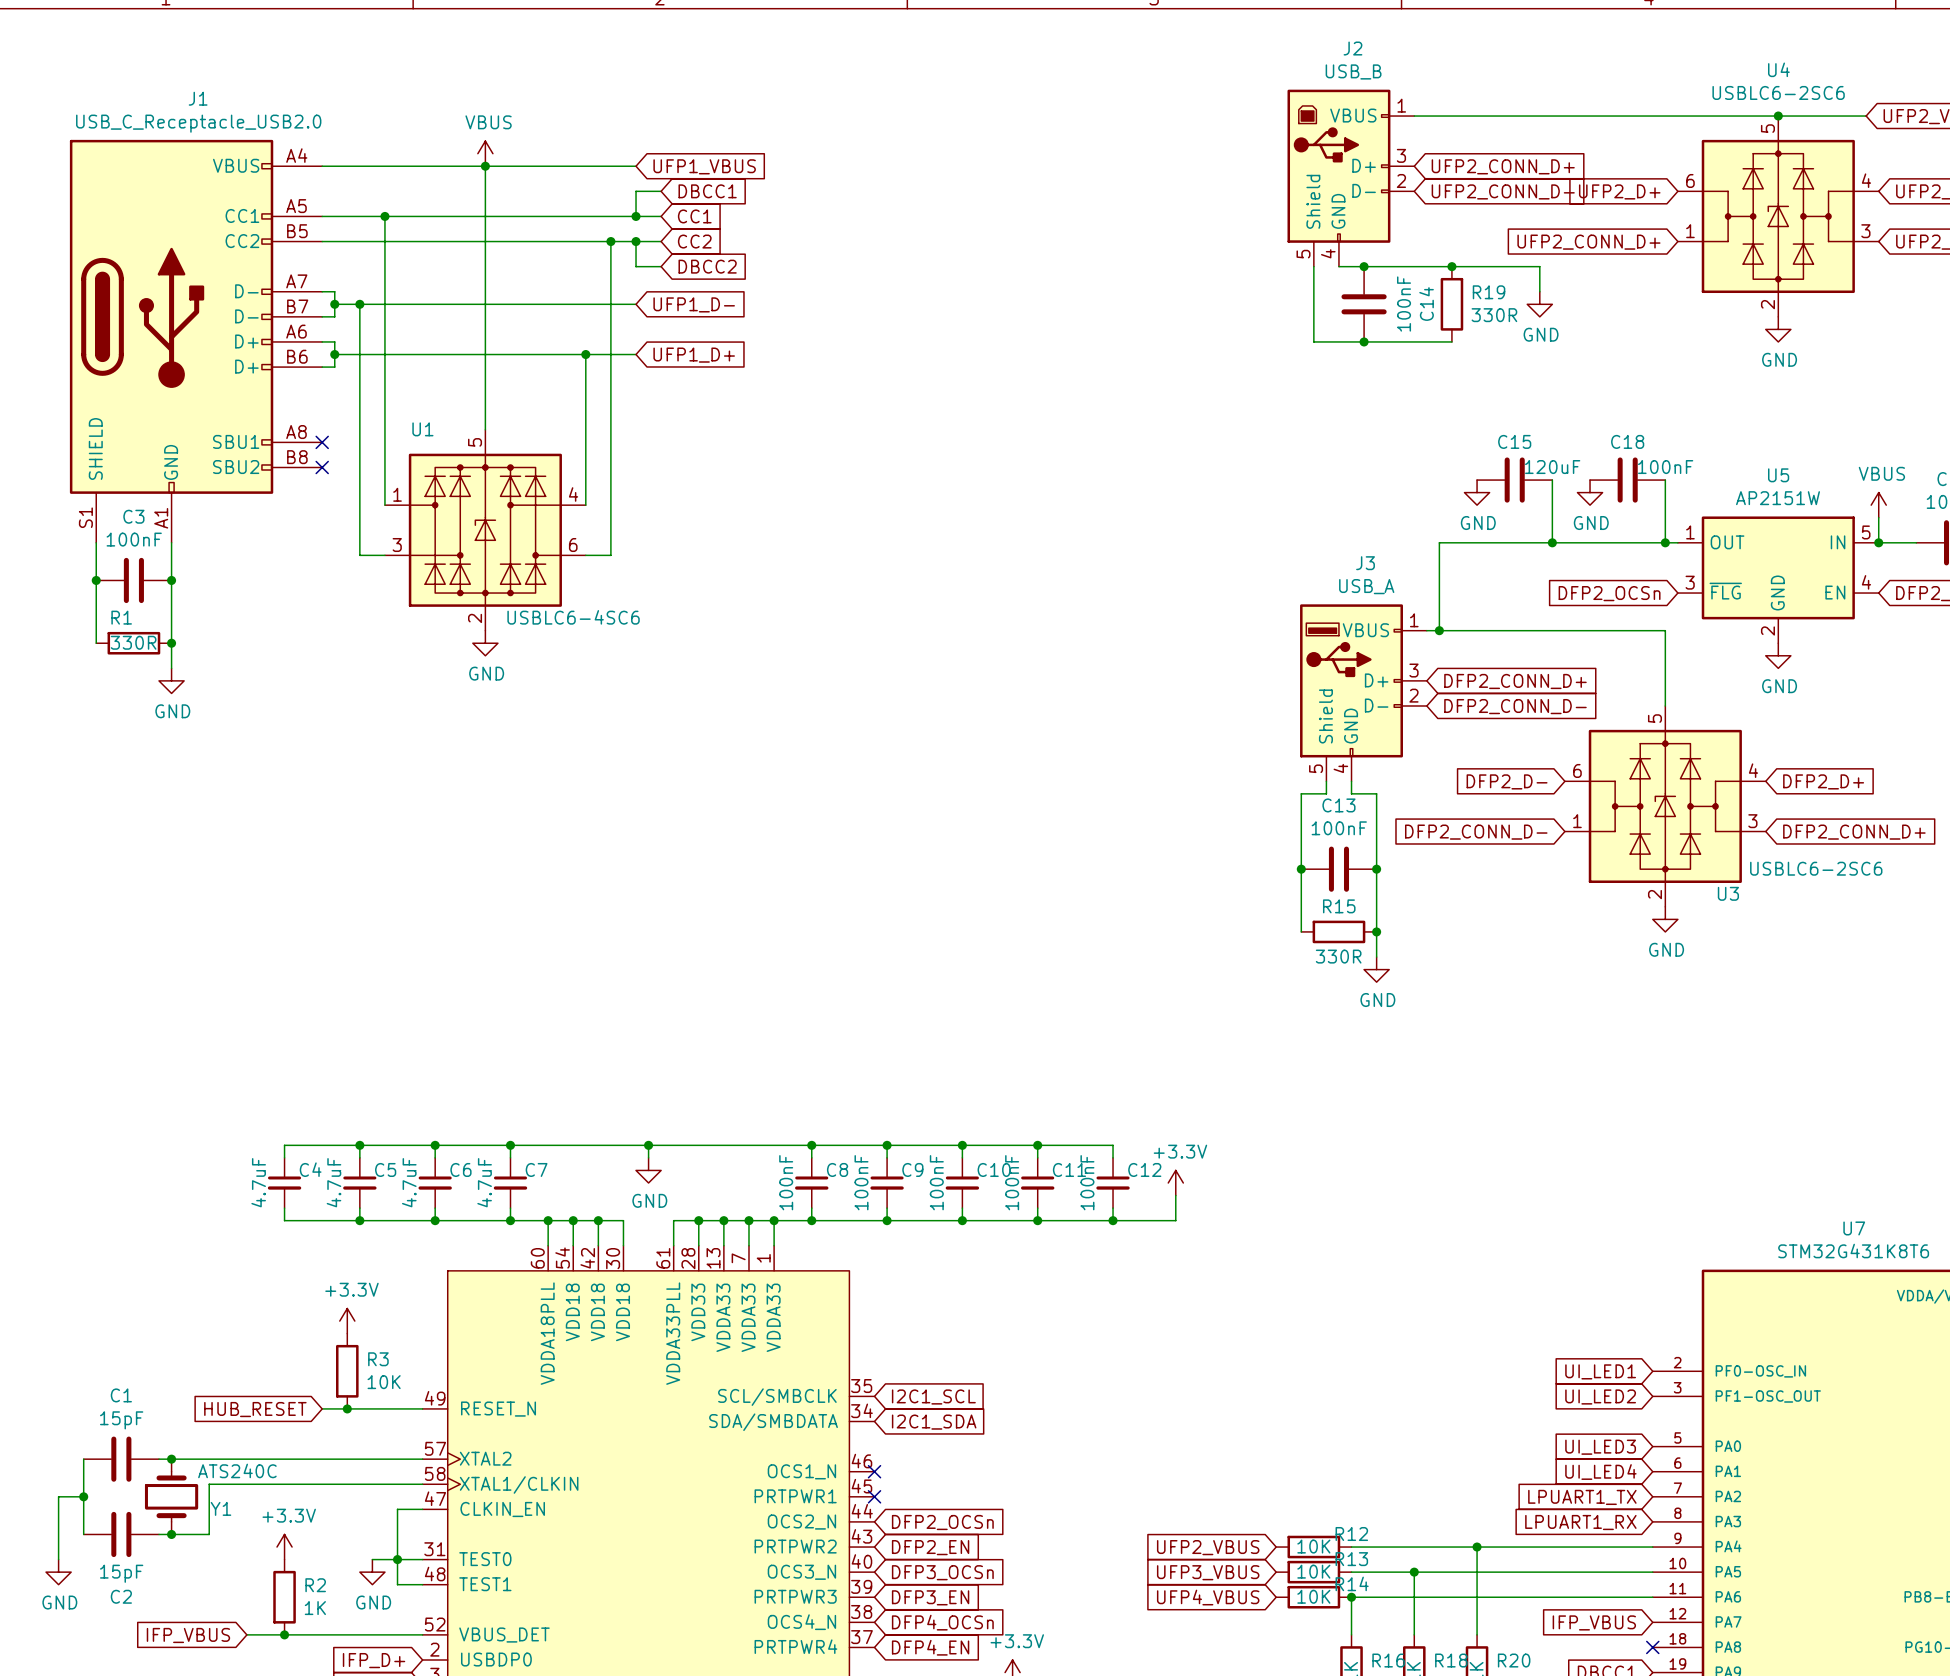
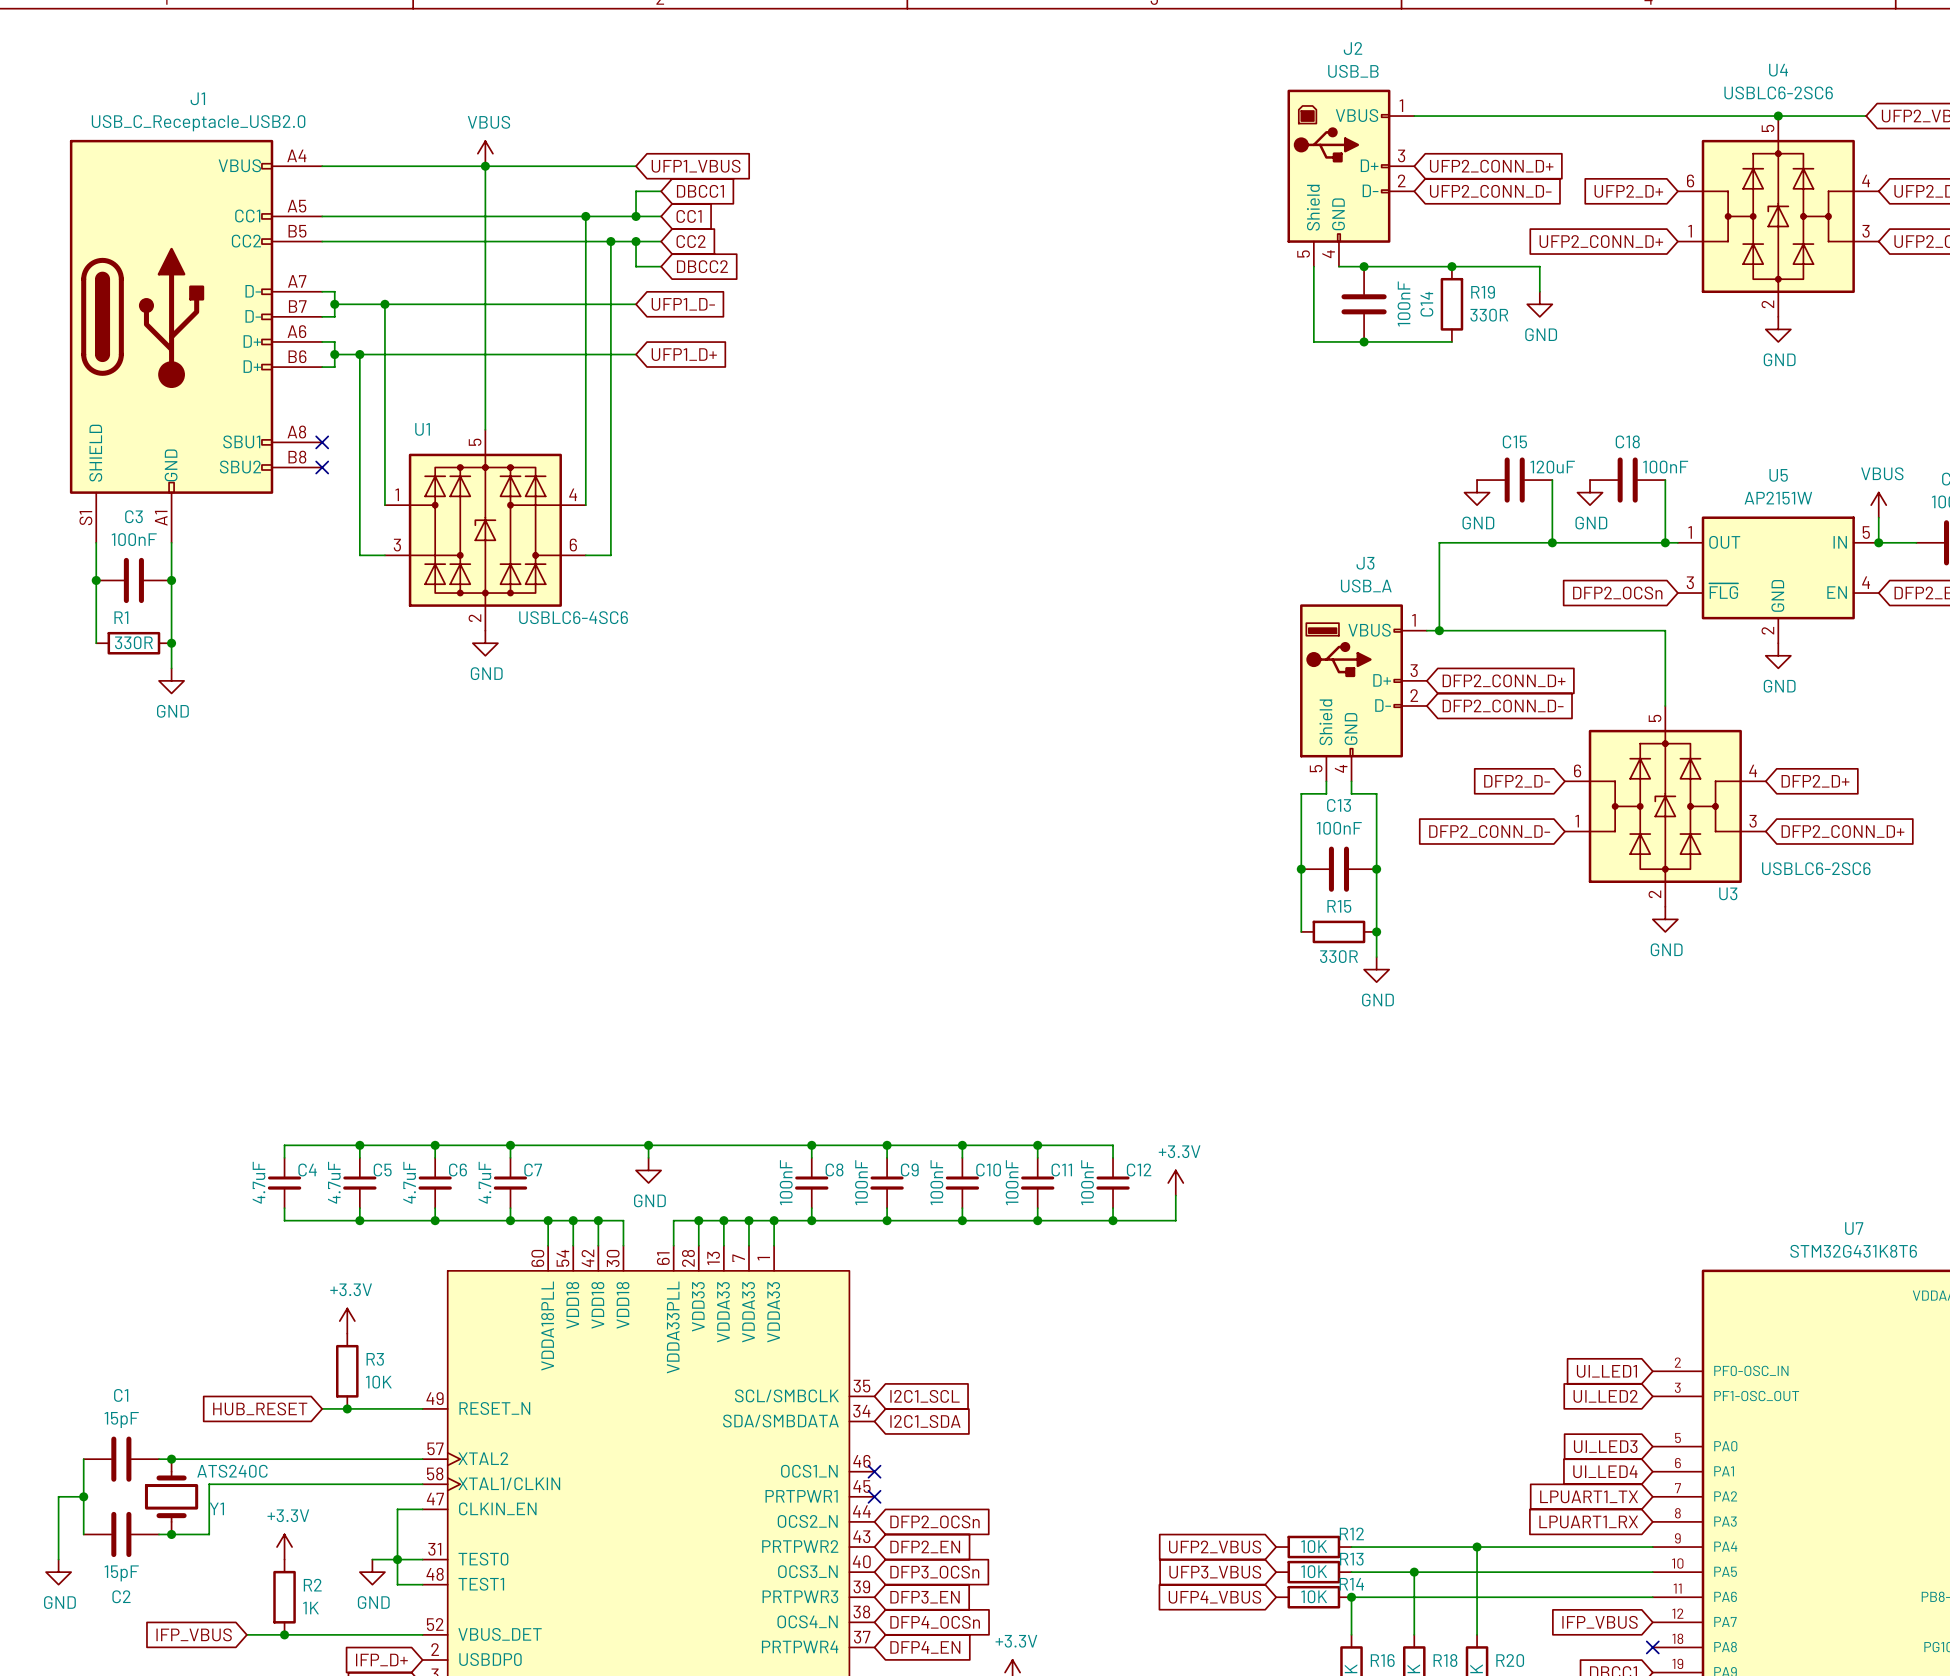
wire: (384, 216) (384, 304) -> none
junction: (384, 216) -> none
wire: none -> (585, 216) (585, 354)
junction: none -> (585, 216)
wire: (359, 304) (359, 354) -> none
junction: (359, 304) -> none
junction: none -> (384, 304)
junction: none -> (359, 354)
junction: (585, 354) -> none

